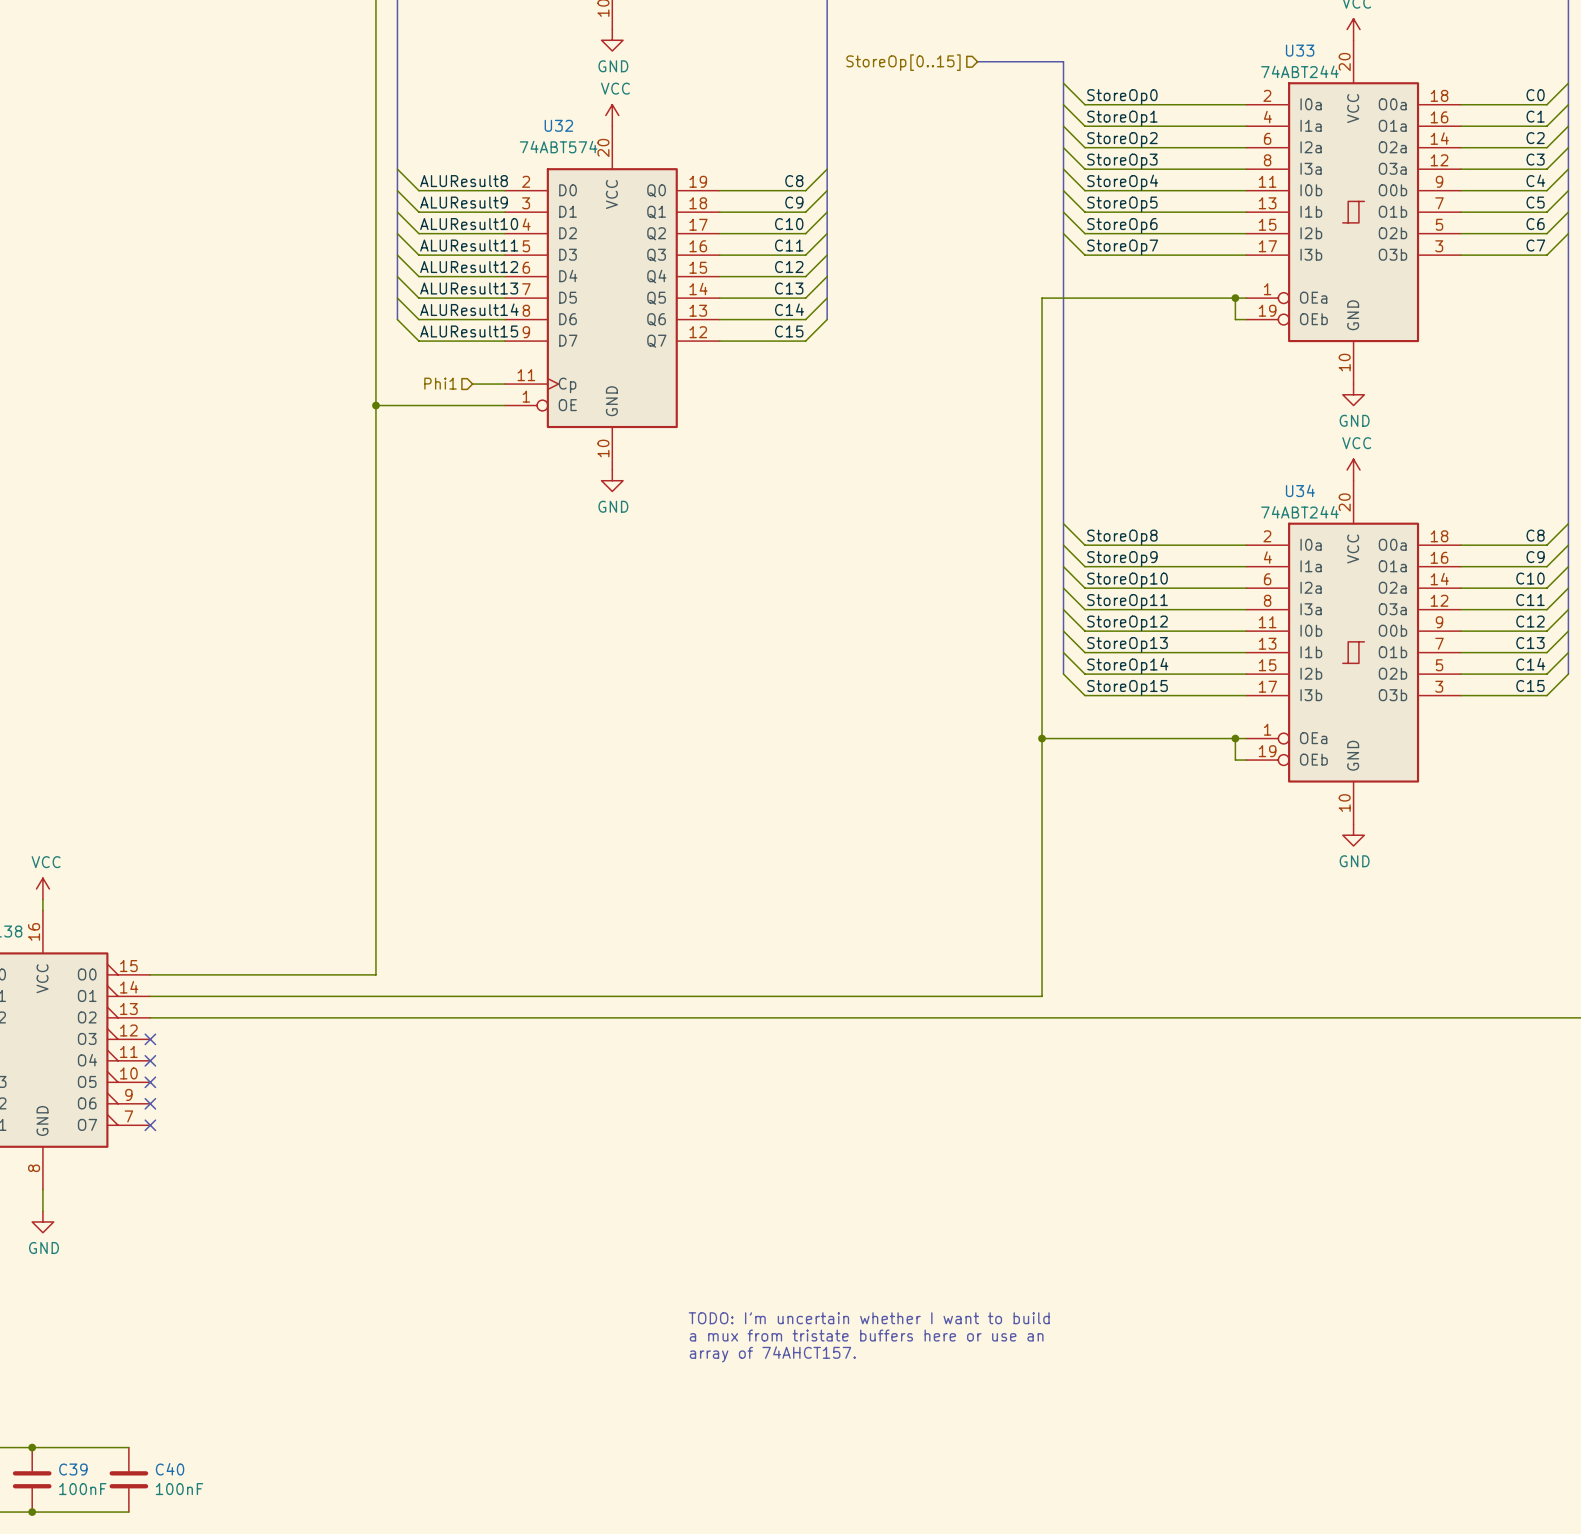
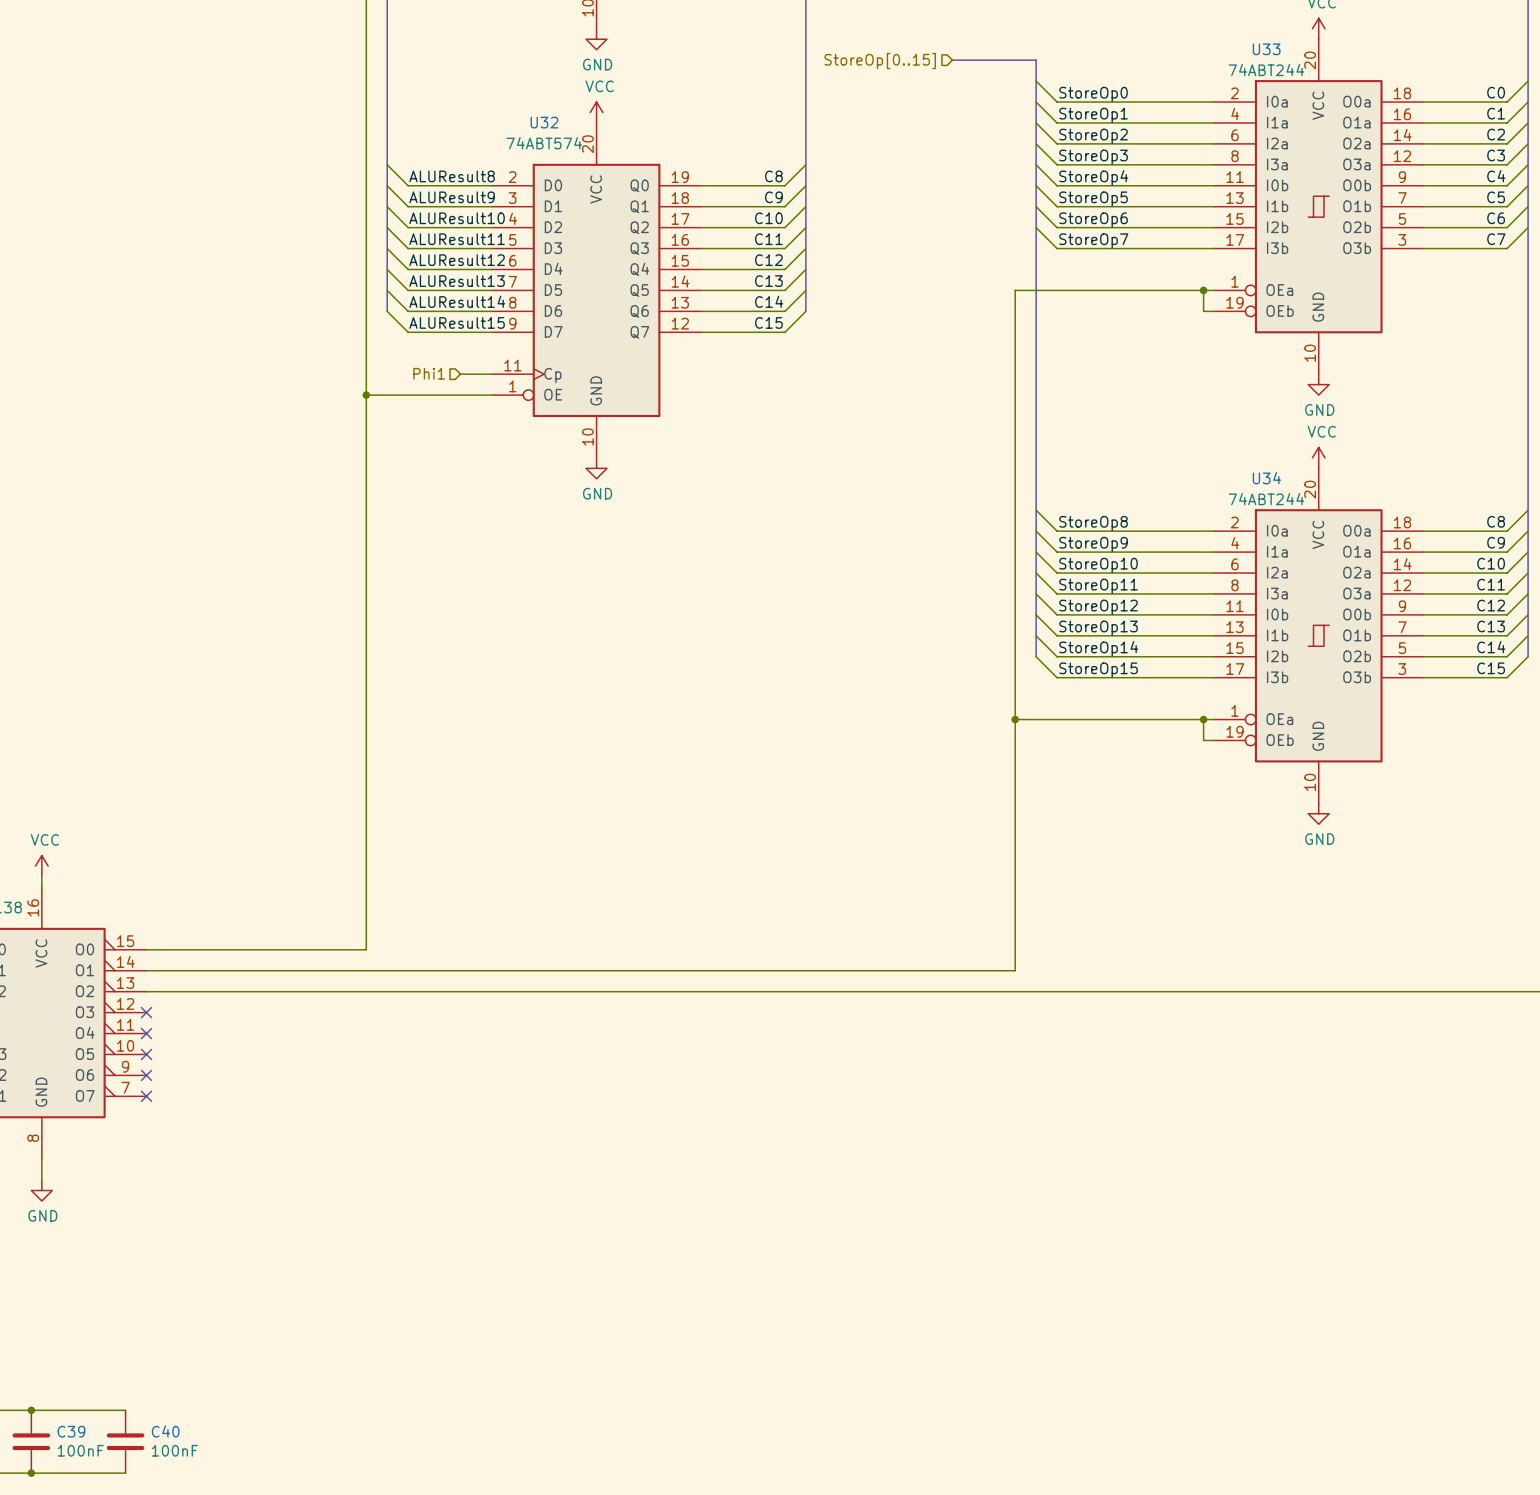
text: TODO: I’m uncertain whether I want to build (869, 1318) -> none
text: a mux from tristate buffers here or use an (866, 1335) -> none
text: array of 74AHCT157. (772, 1354) -> none

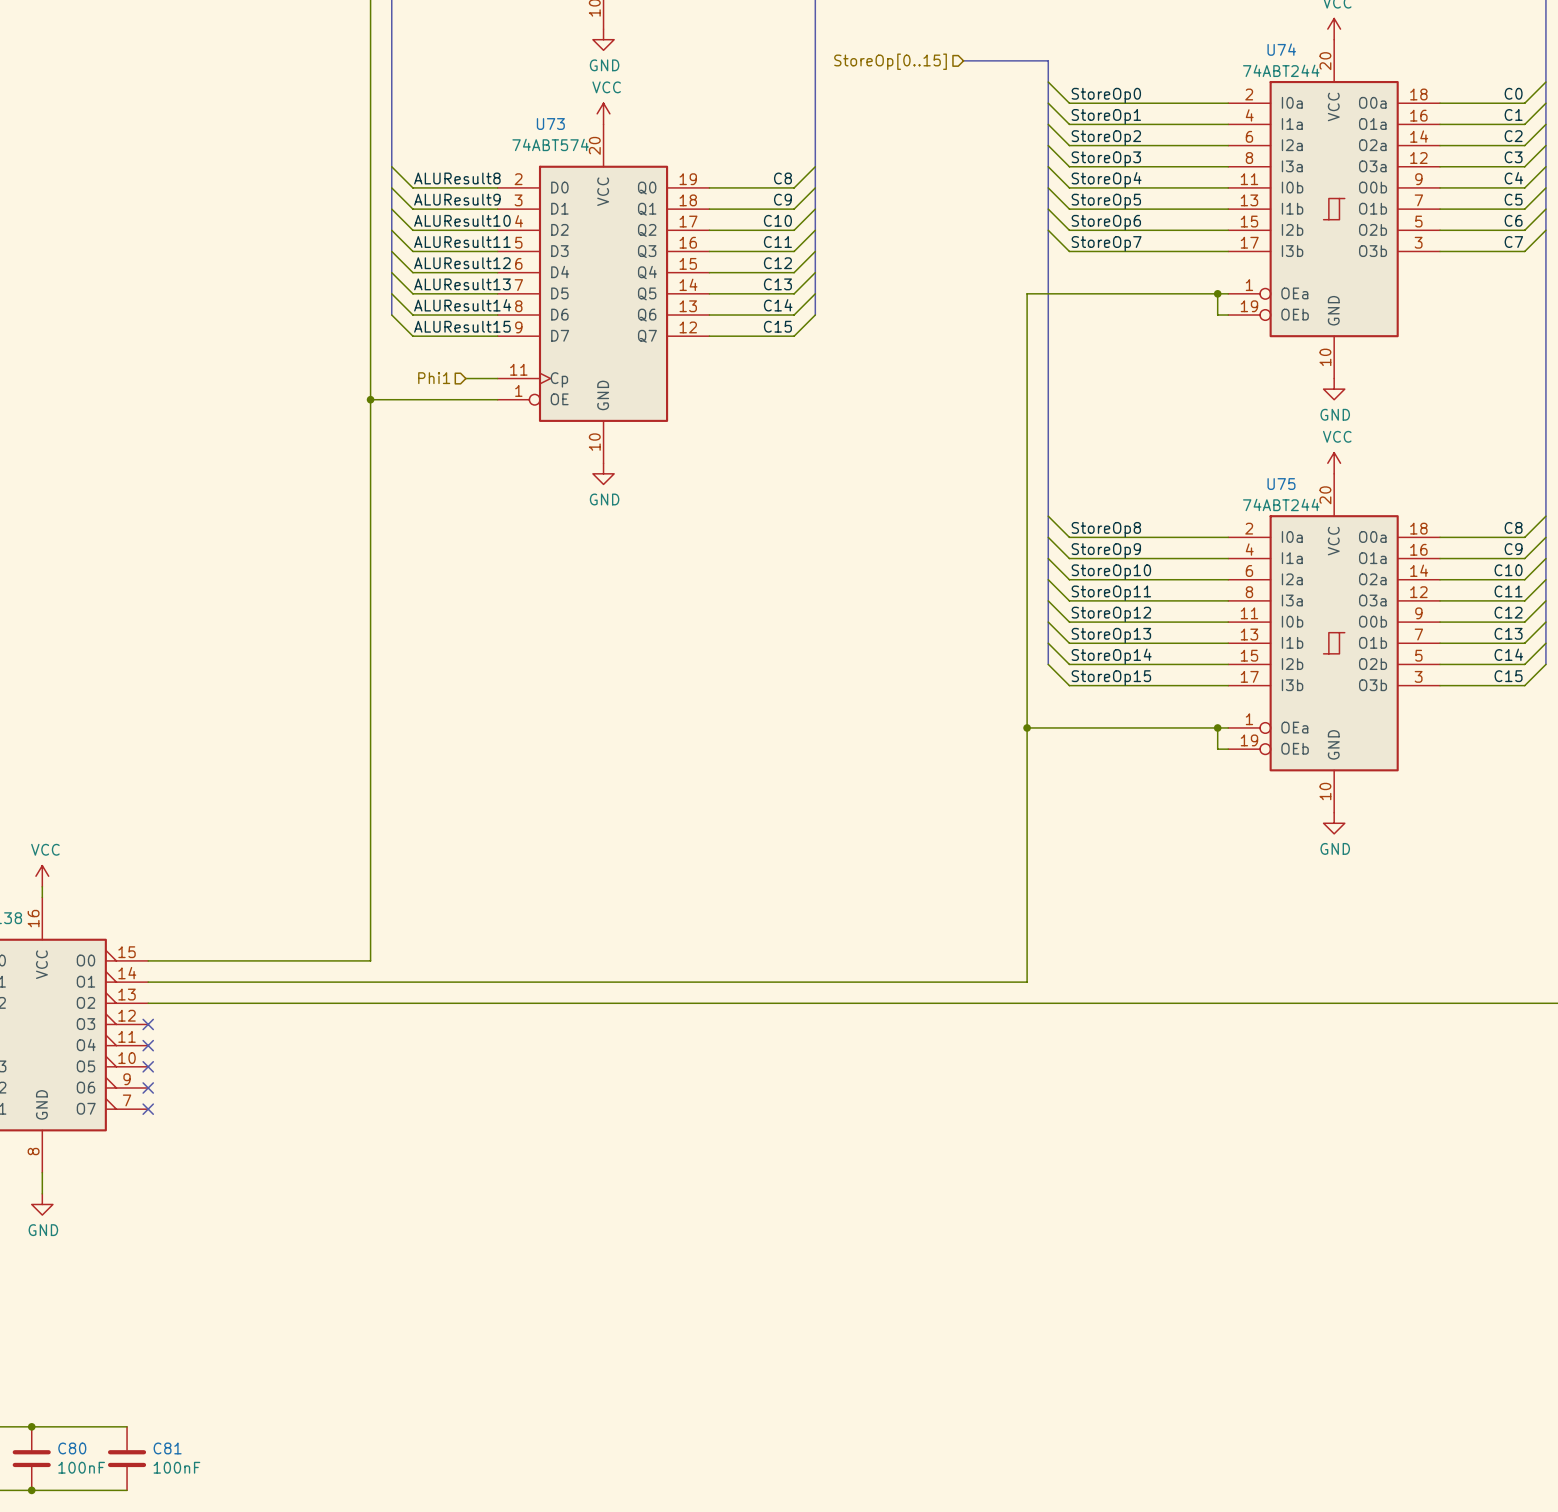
U33 name: U33 (1266, 49) -> U74 (1281, 49)
U32 name: U32 (544, 122) -> U73 (550, 124)
U34 name: U34 (1266, 478) -> U75 (1281, 484)
C39 name: C39 (71, 1431) -> C80 (72, 1448)
C40 name: C40 (165, 1431) -> C81 (167, 1448)

